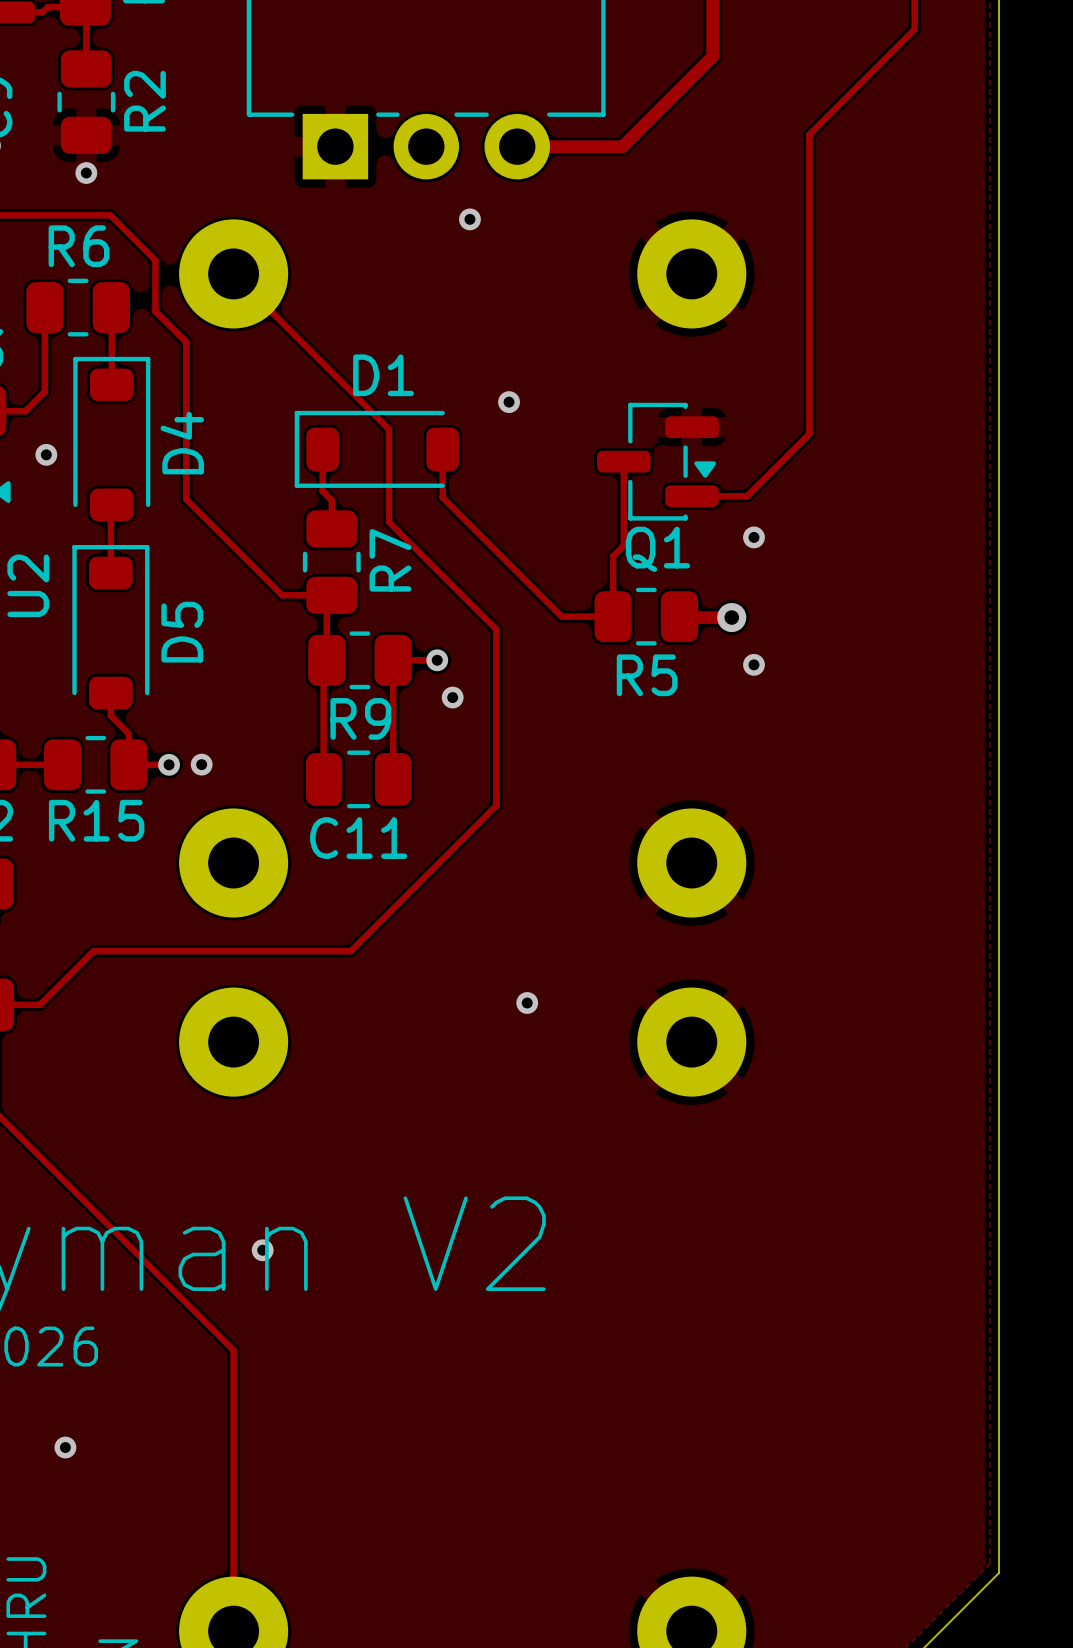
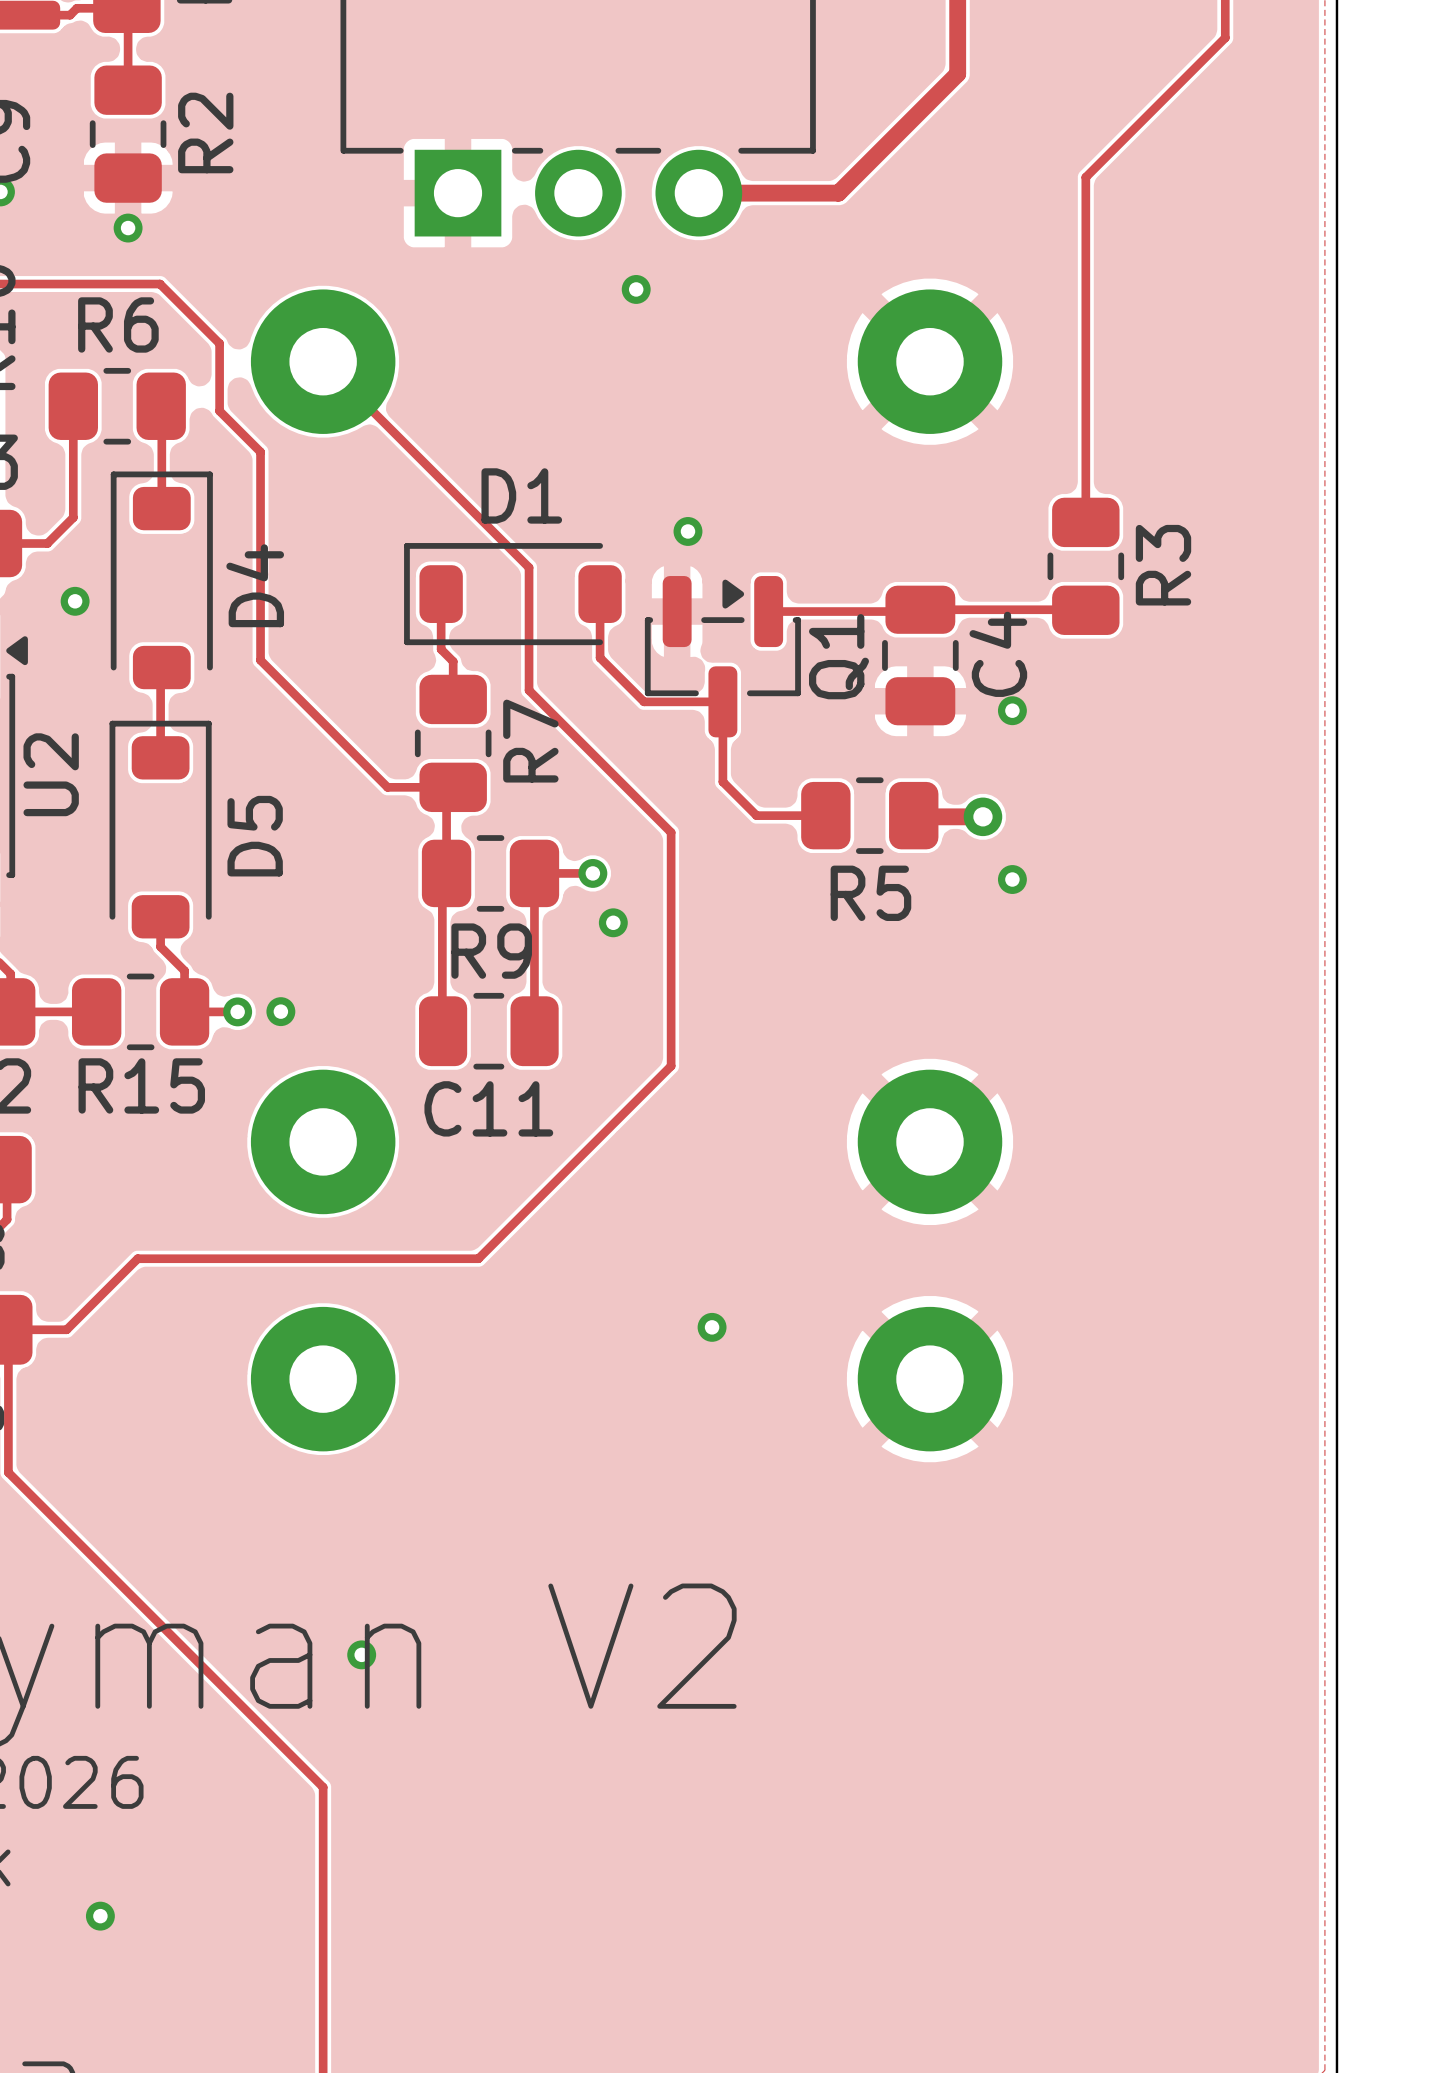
track: (809, 395) (809, 433) (747, 496) (692, 496) -> none
R3: none -> (1085, 566)
track: (623, 461) (623, 545) (613, 556) (613, 616) -> none
Q1 rotation: 0° (657, 461) -> 90° counterclockwise (722, 656)
Q1 position: (657, 461) -> (722, 656)
track: none -> (1085, 609) (768, 611)
C4: none -> (920, 655)
track: (475, 530) (561, 616) -> (644, 701) (722, 701) (722, 781) (757, 815)

